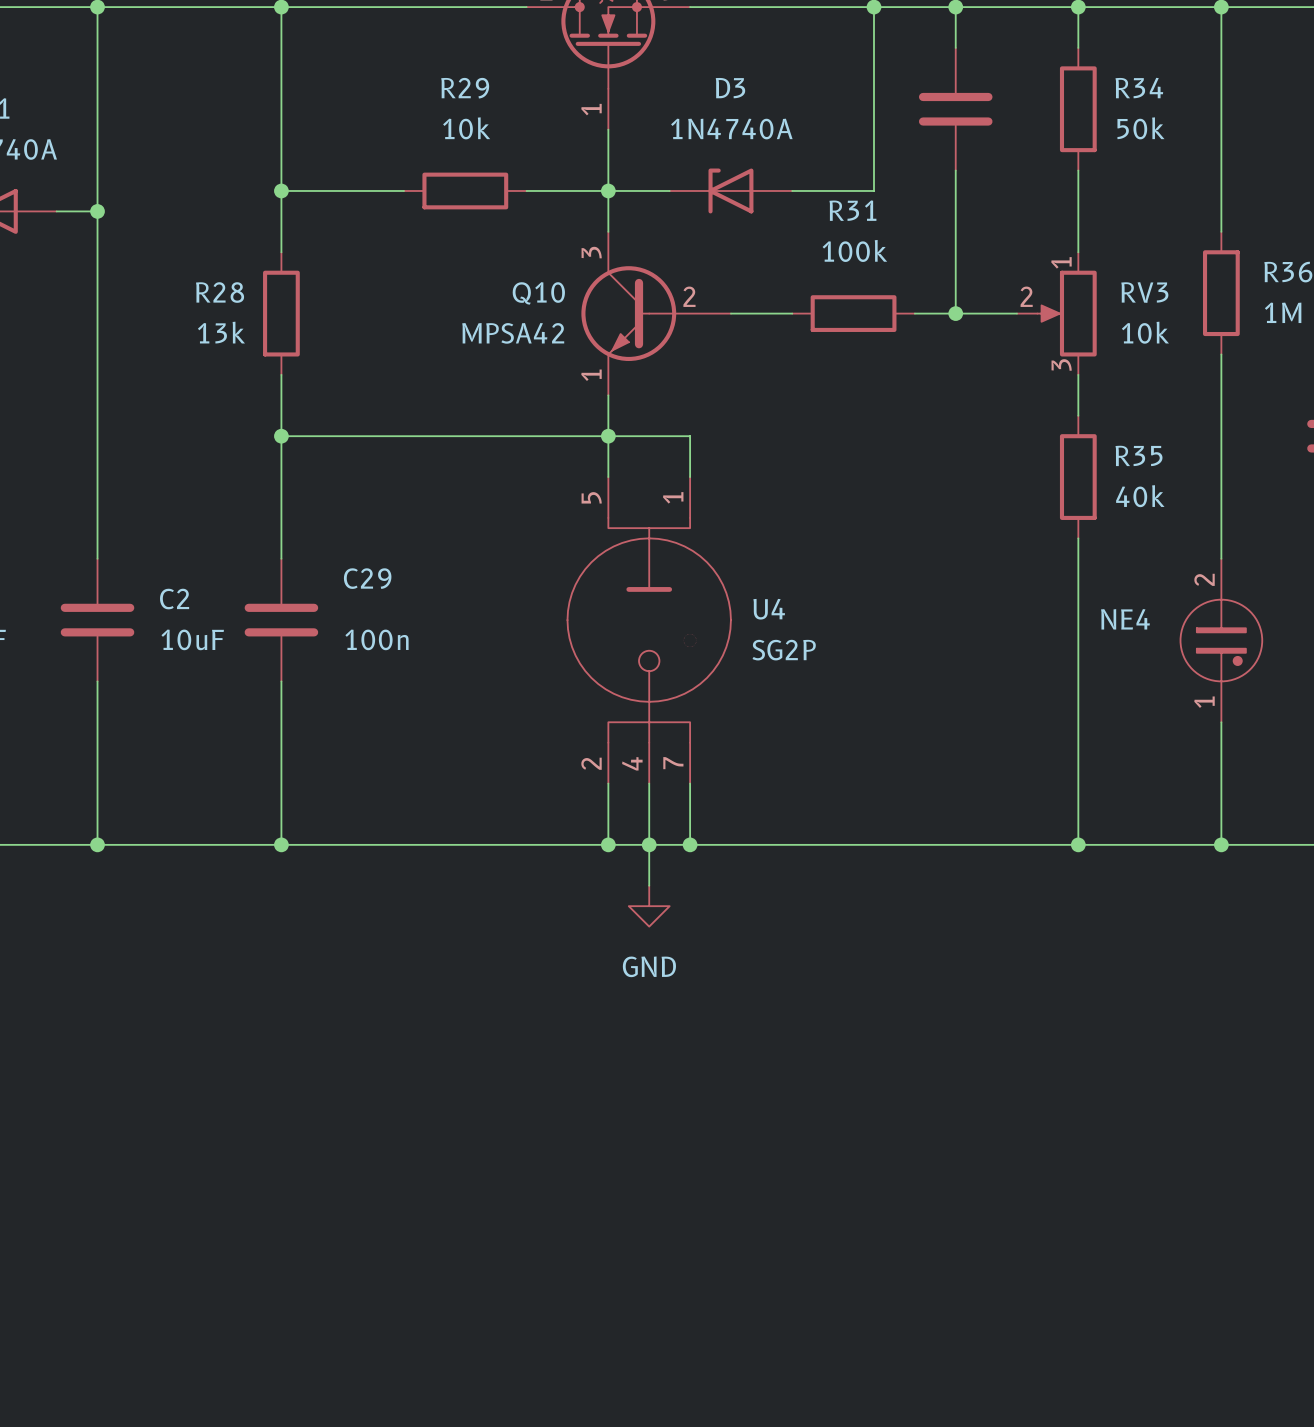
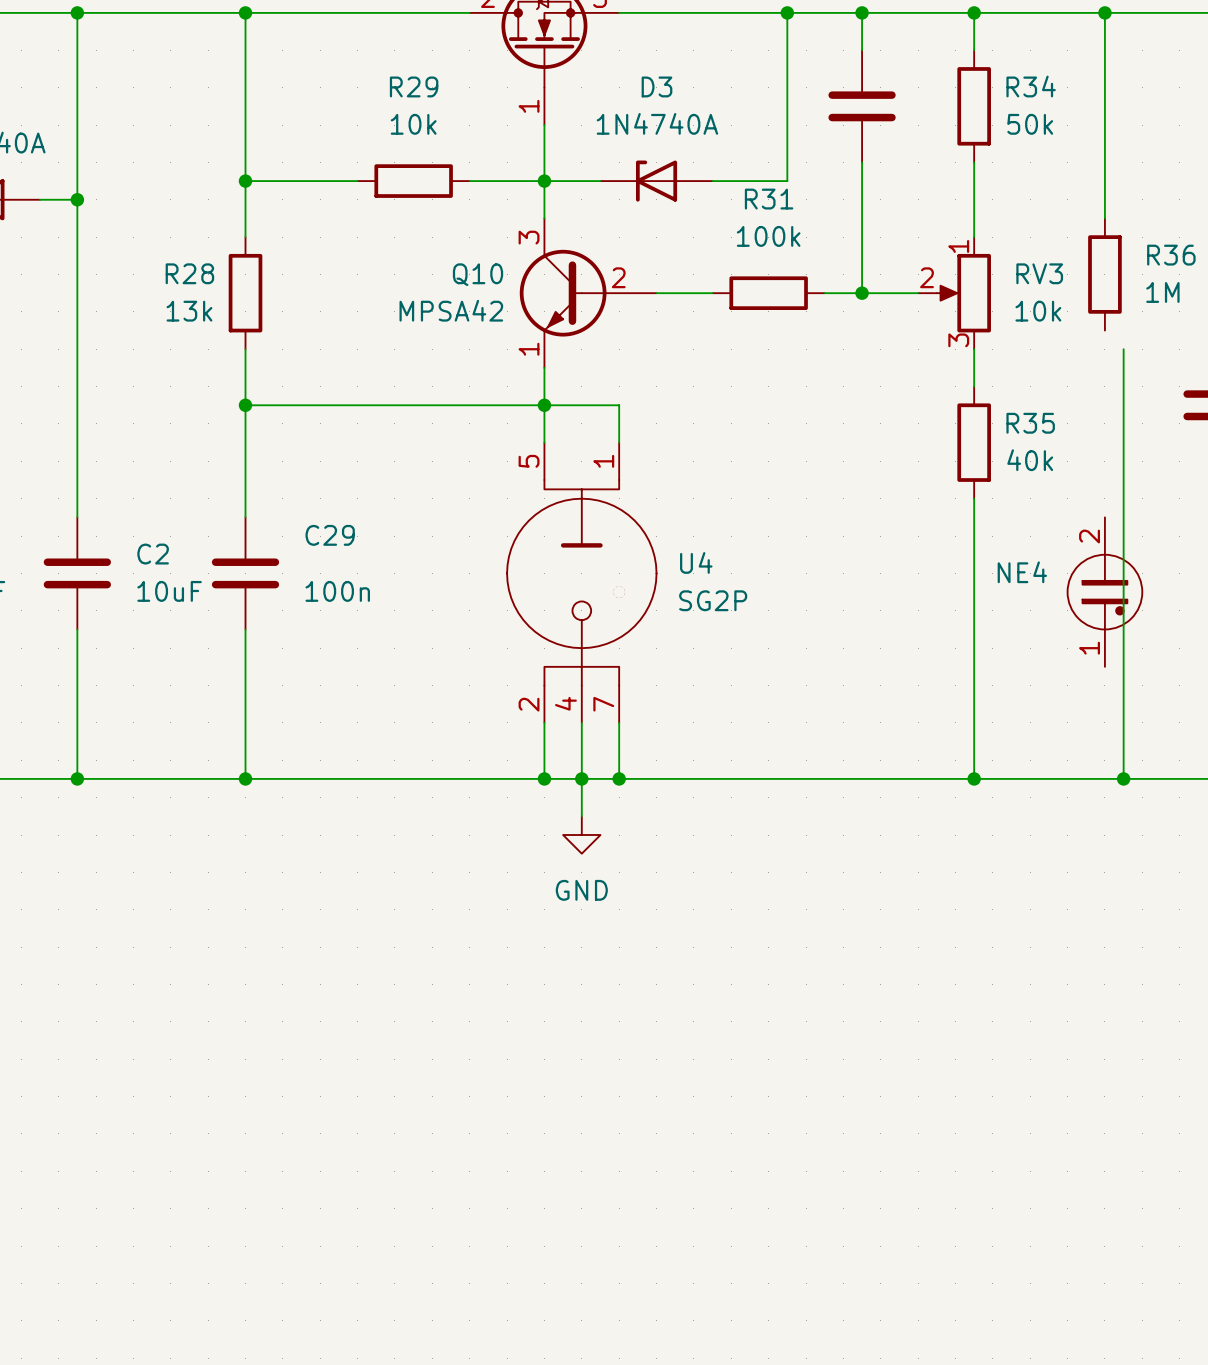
wire: (1221, 354) (1221, 558) -> none
wire: none -> (1123, 349) (1123, 778)
wire: (1221, 722) (1221, 844) -> none
junction position: (1221, 844) -> (1123, 778)

